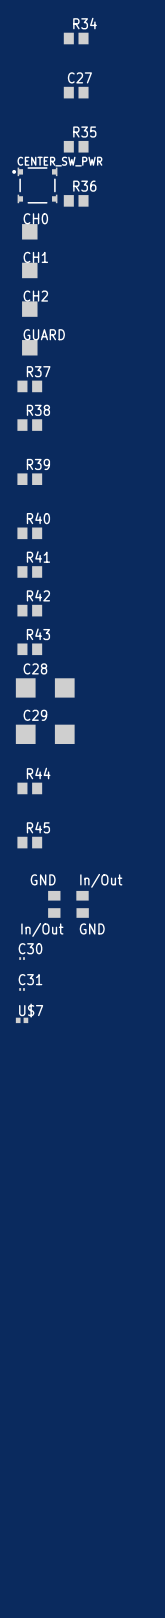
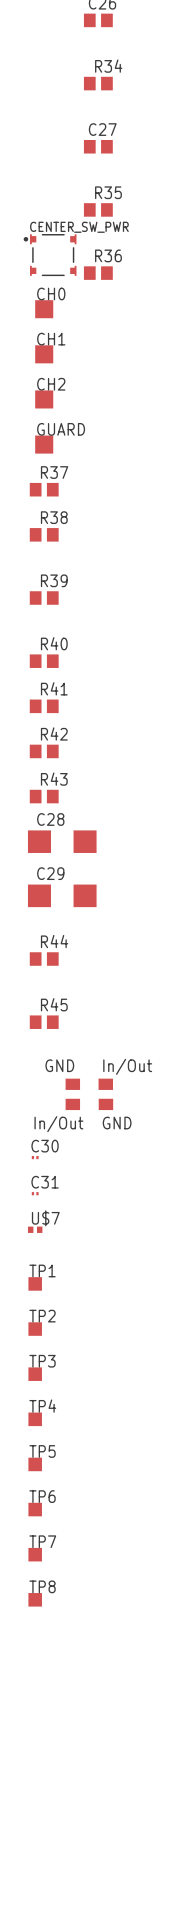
TP1: none -> (35, 1283)
TP2: none -> (35, 1329)
TP3: none -> (35, 1374)
TP4: none -> (35, 1419)
TP5: none -> (35, 1464)
TP6: none -> (35, 1509)
TP7: none -> (35, 1554)
TP8: none -> (35, 1599)

